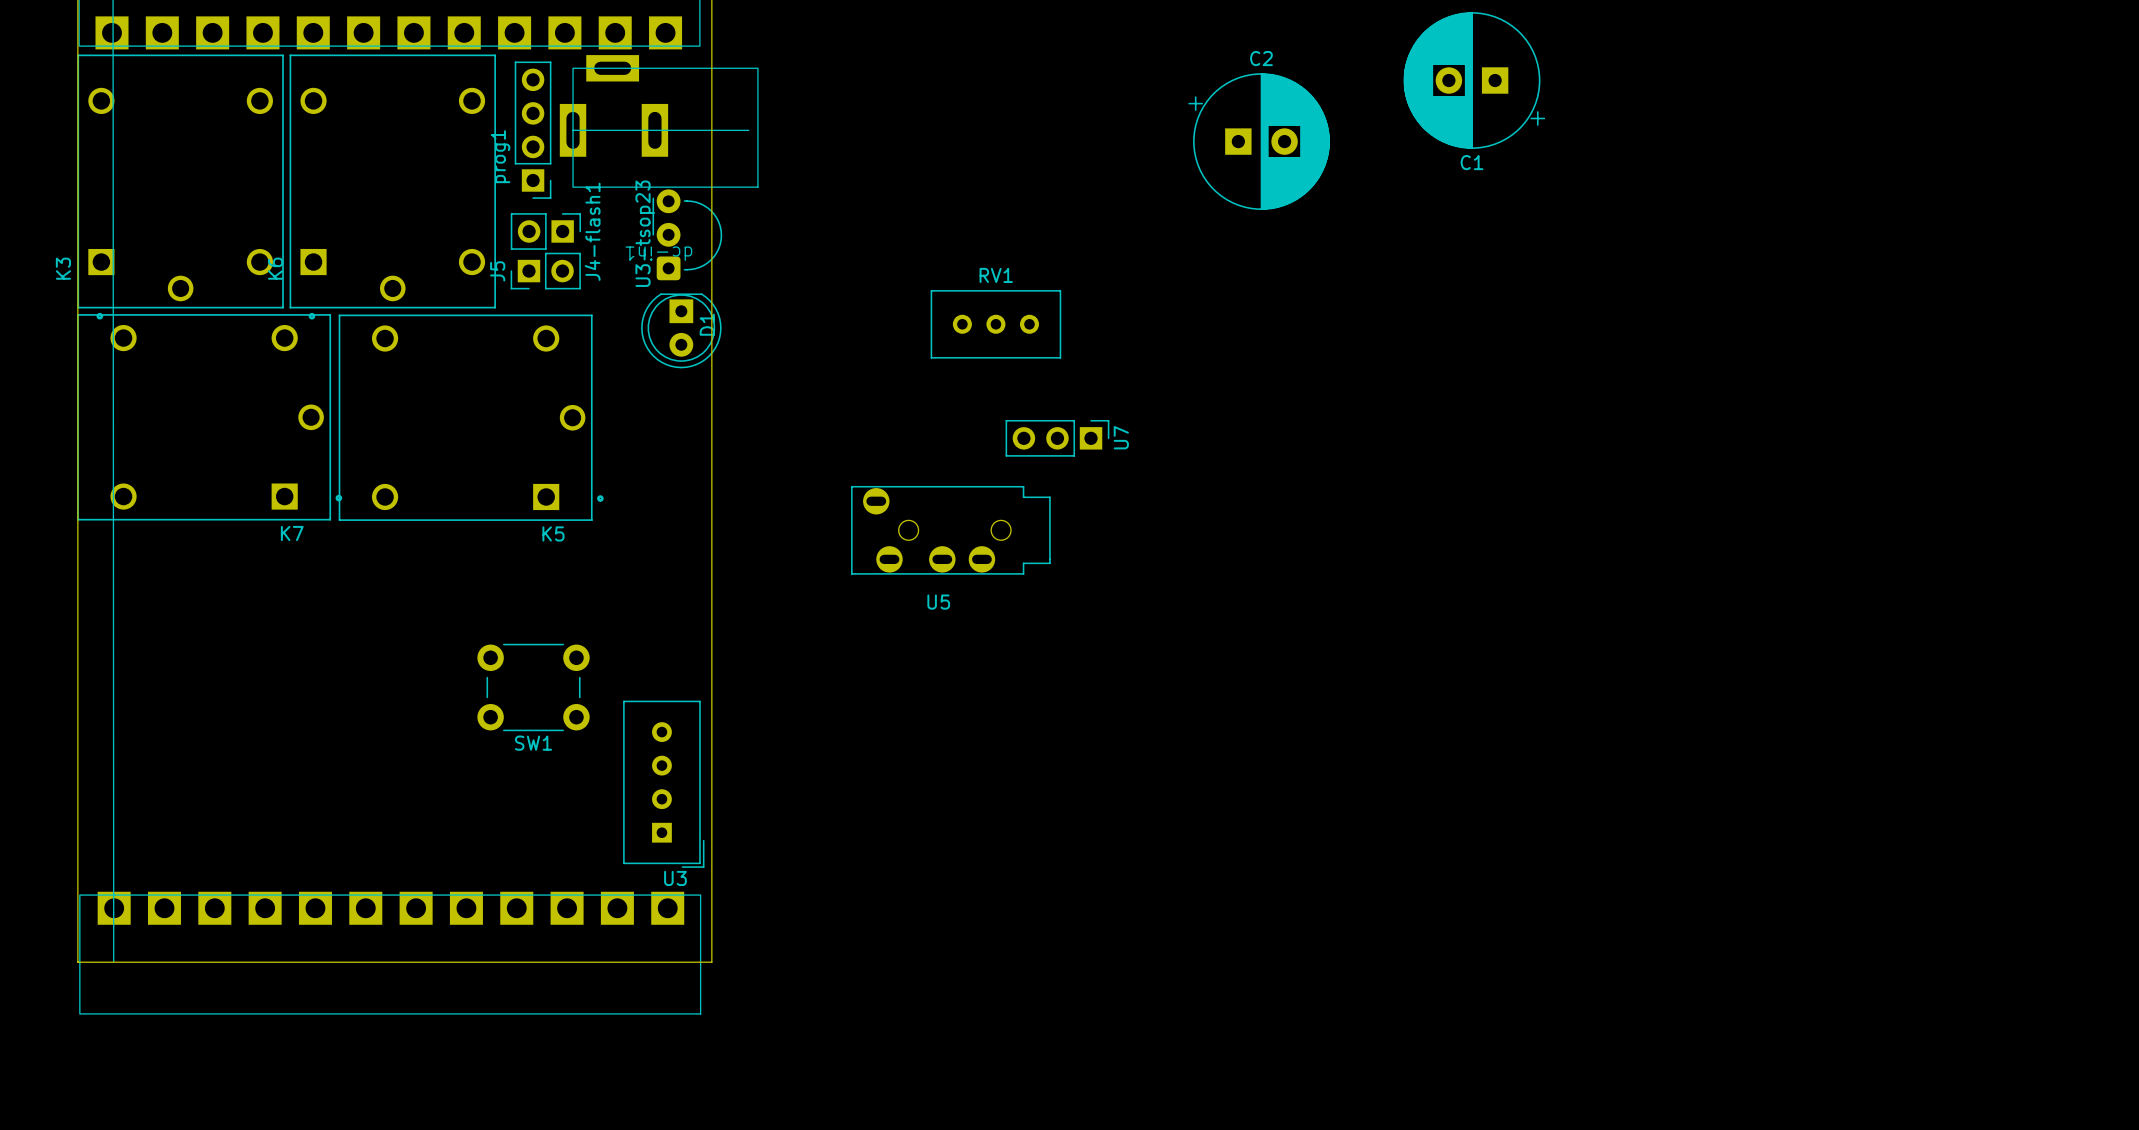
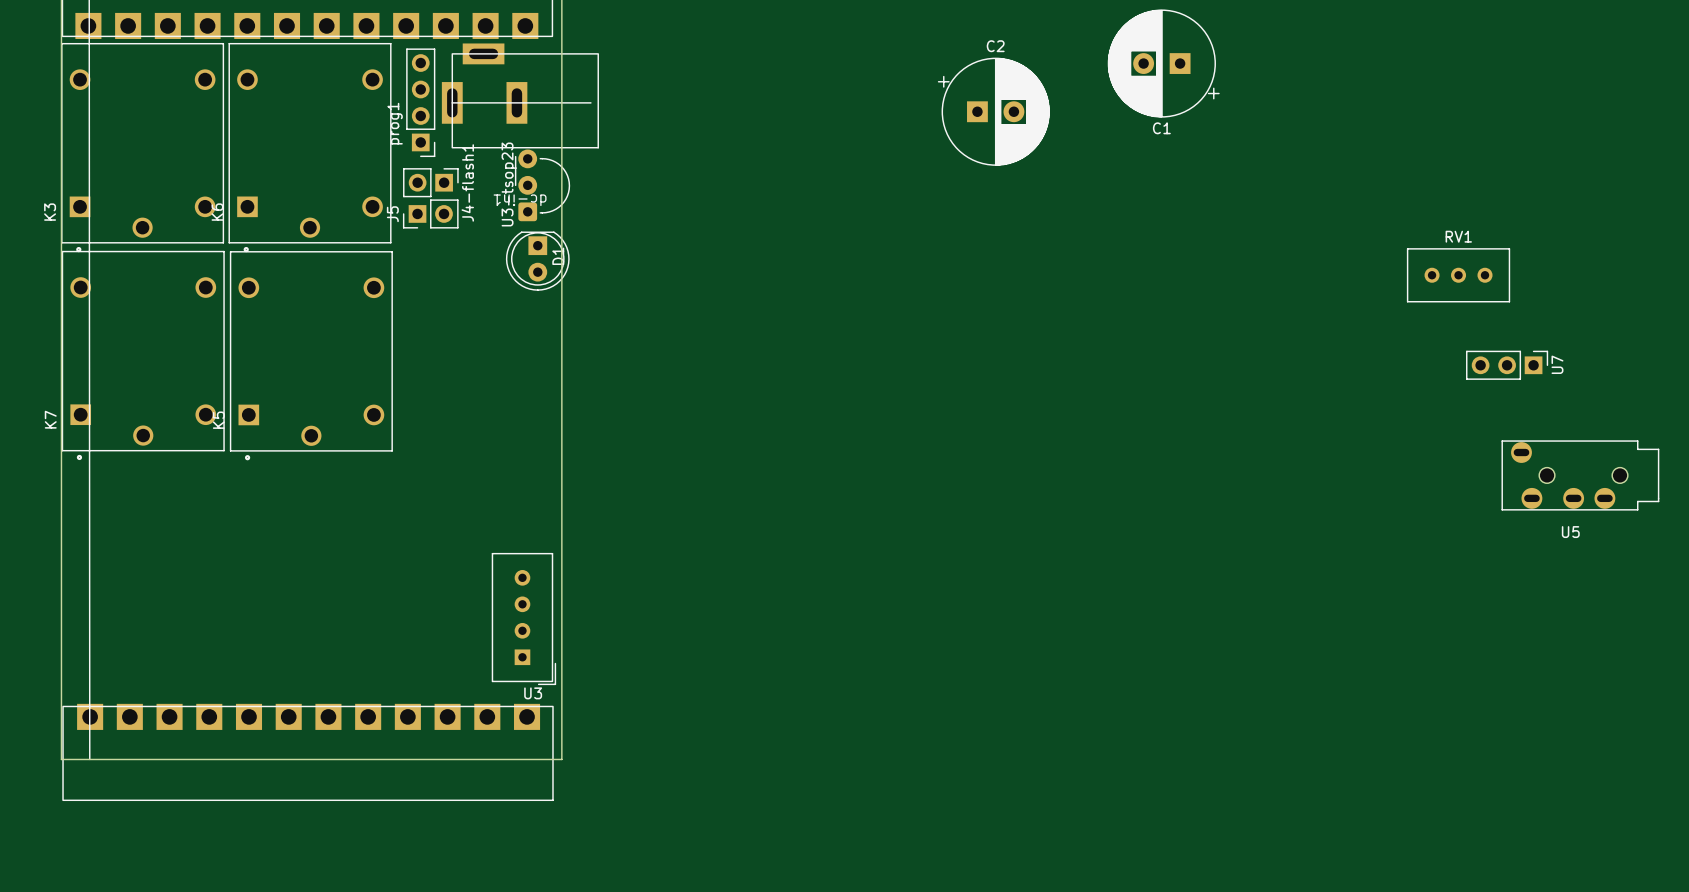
RV1 position: (995, 324) -> (1458, 275)
K7 rotation: 0° (209, 417) -> 90° clockwise (143, 355)
K5 rotation: 0° (471, 417) -> 90° clockwise (311, 355)
U7 position: (1057, 438) -> (1507, 365)
U5 position: (950, 530) -> (1580, 475)
SW1: (533, 687) -> none

